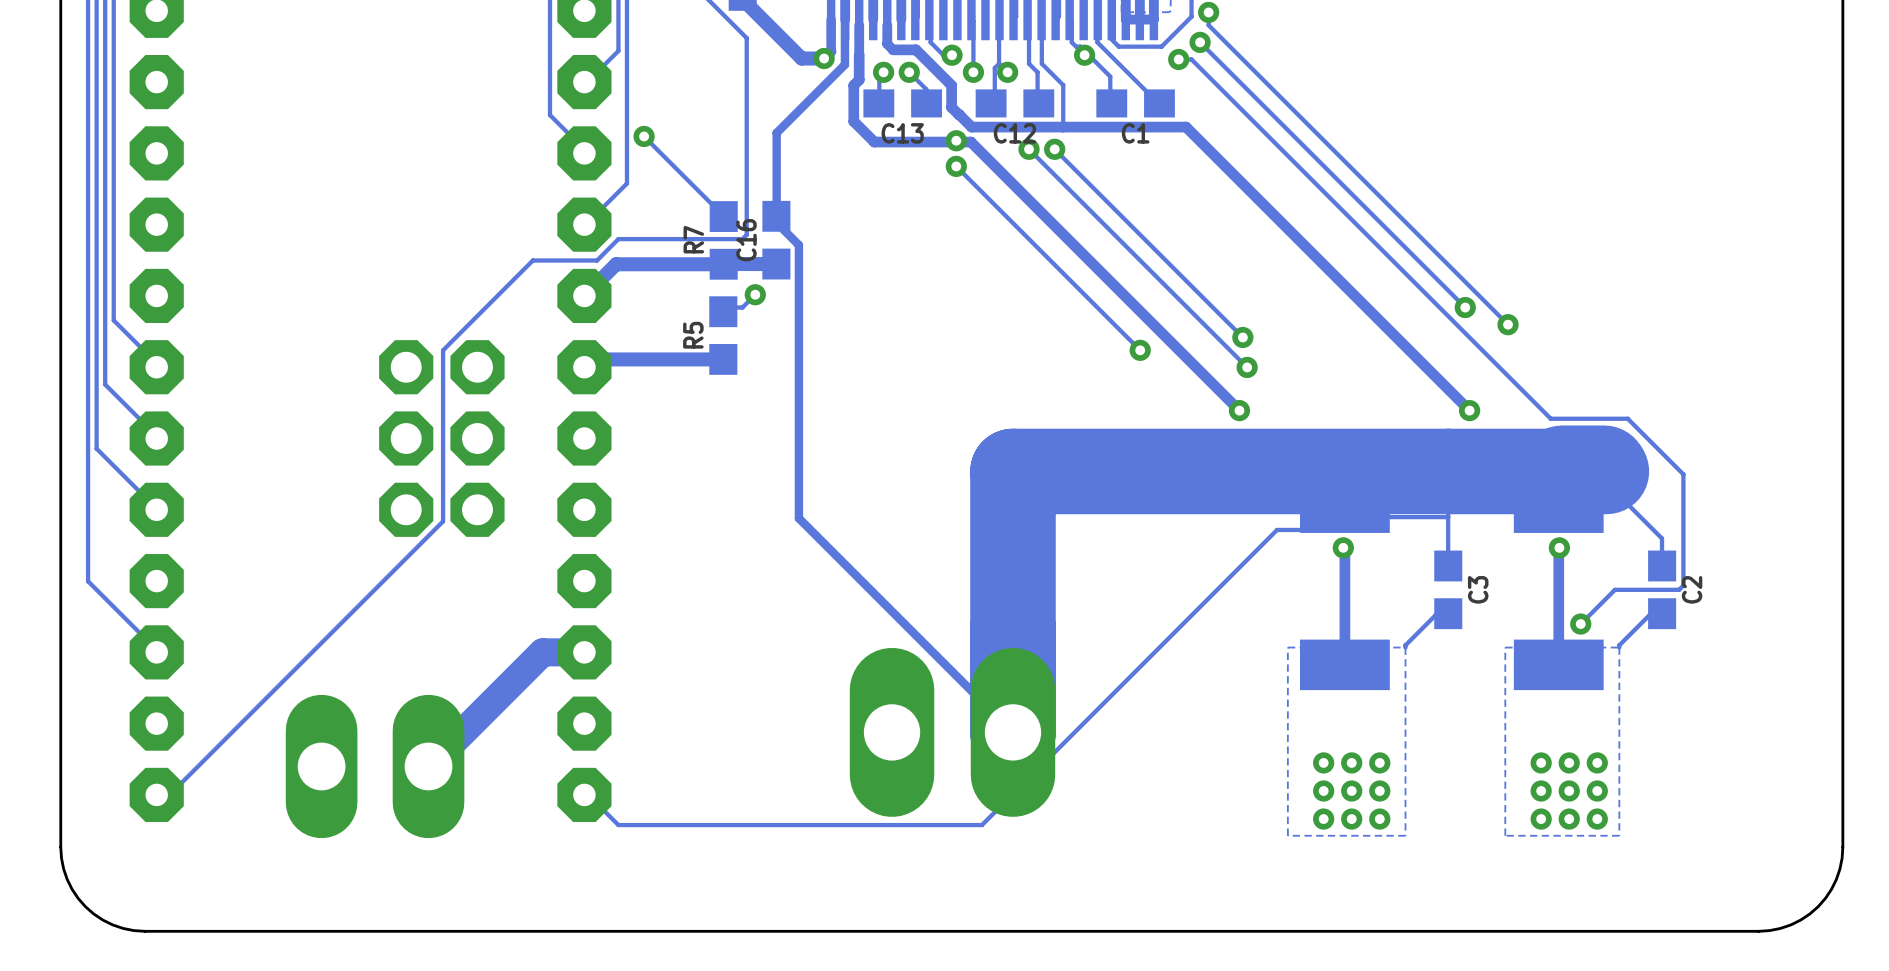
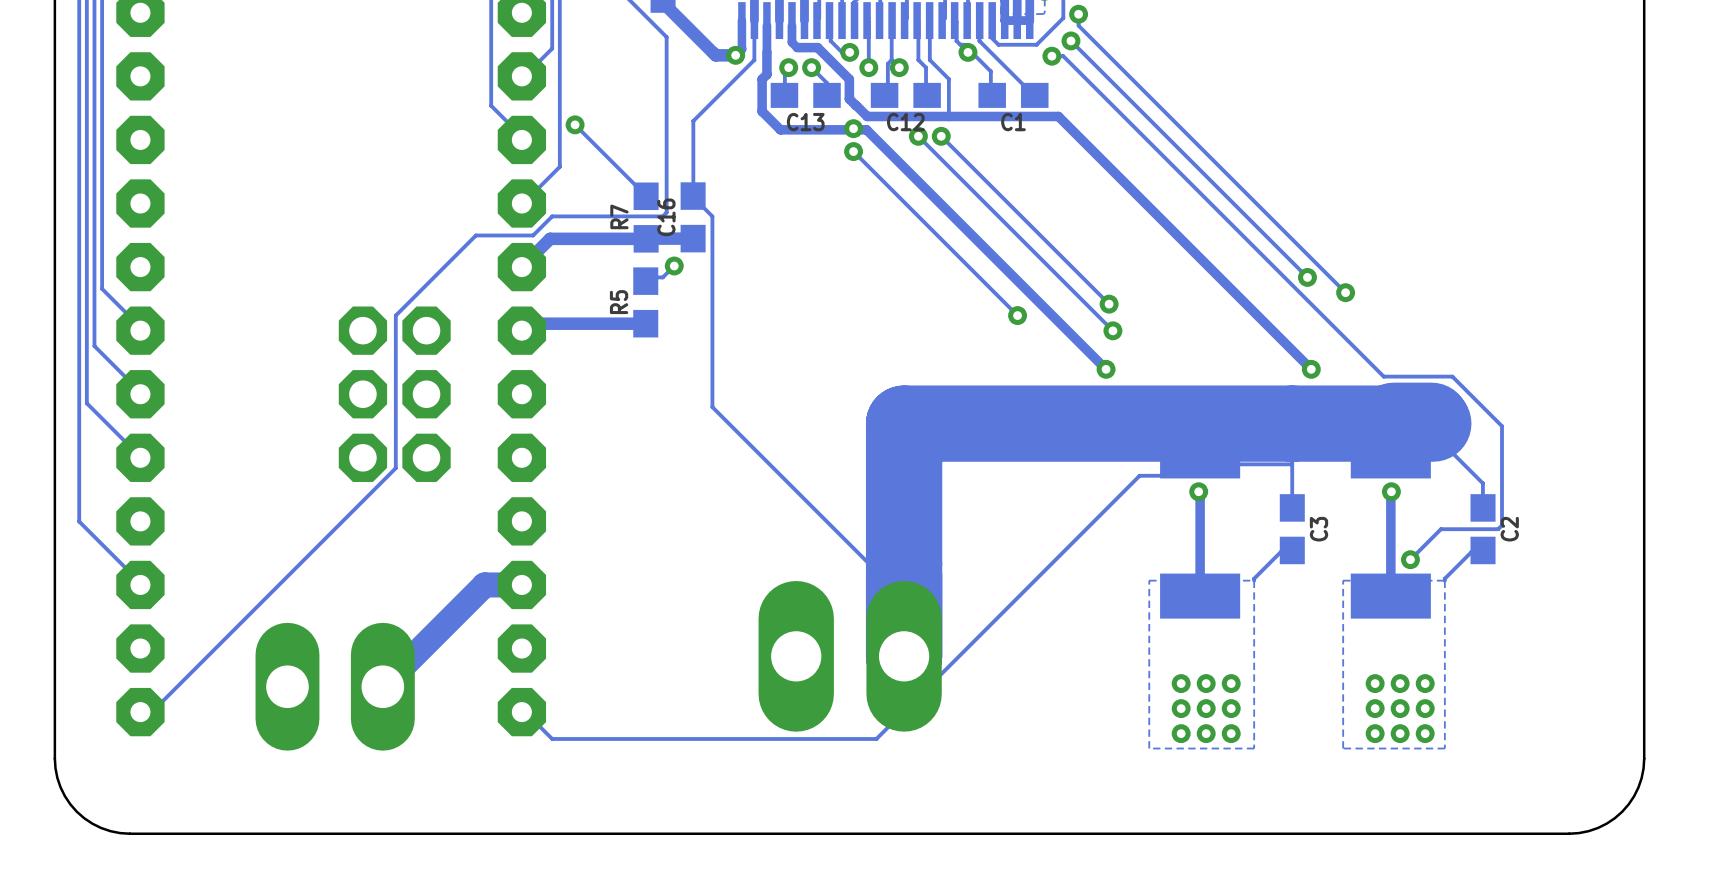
track: (844, 19) (844, 64) (776, 132) (776, 217) -> (868, 563) (712, 407) (712, 216) (693, 197)
track: (776, 216) (776, 222) (798, 245) (798, 518) (1012, 732) -> none

